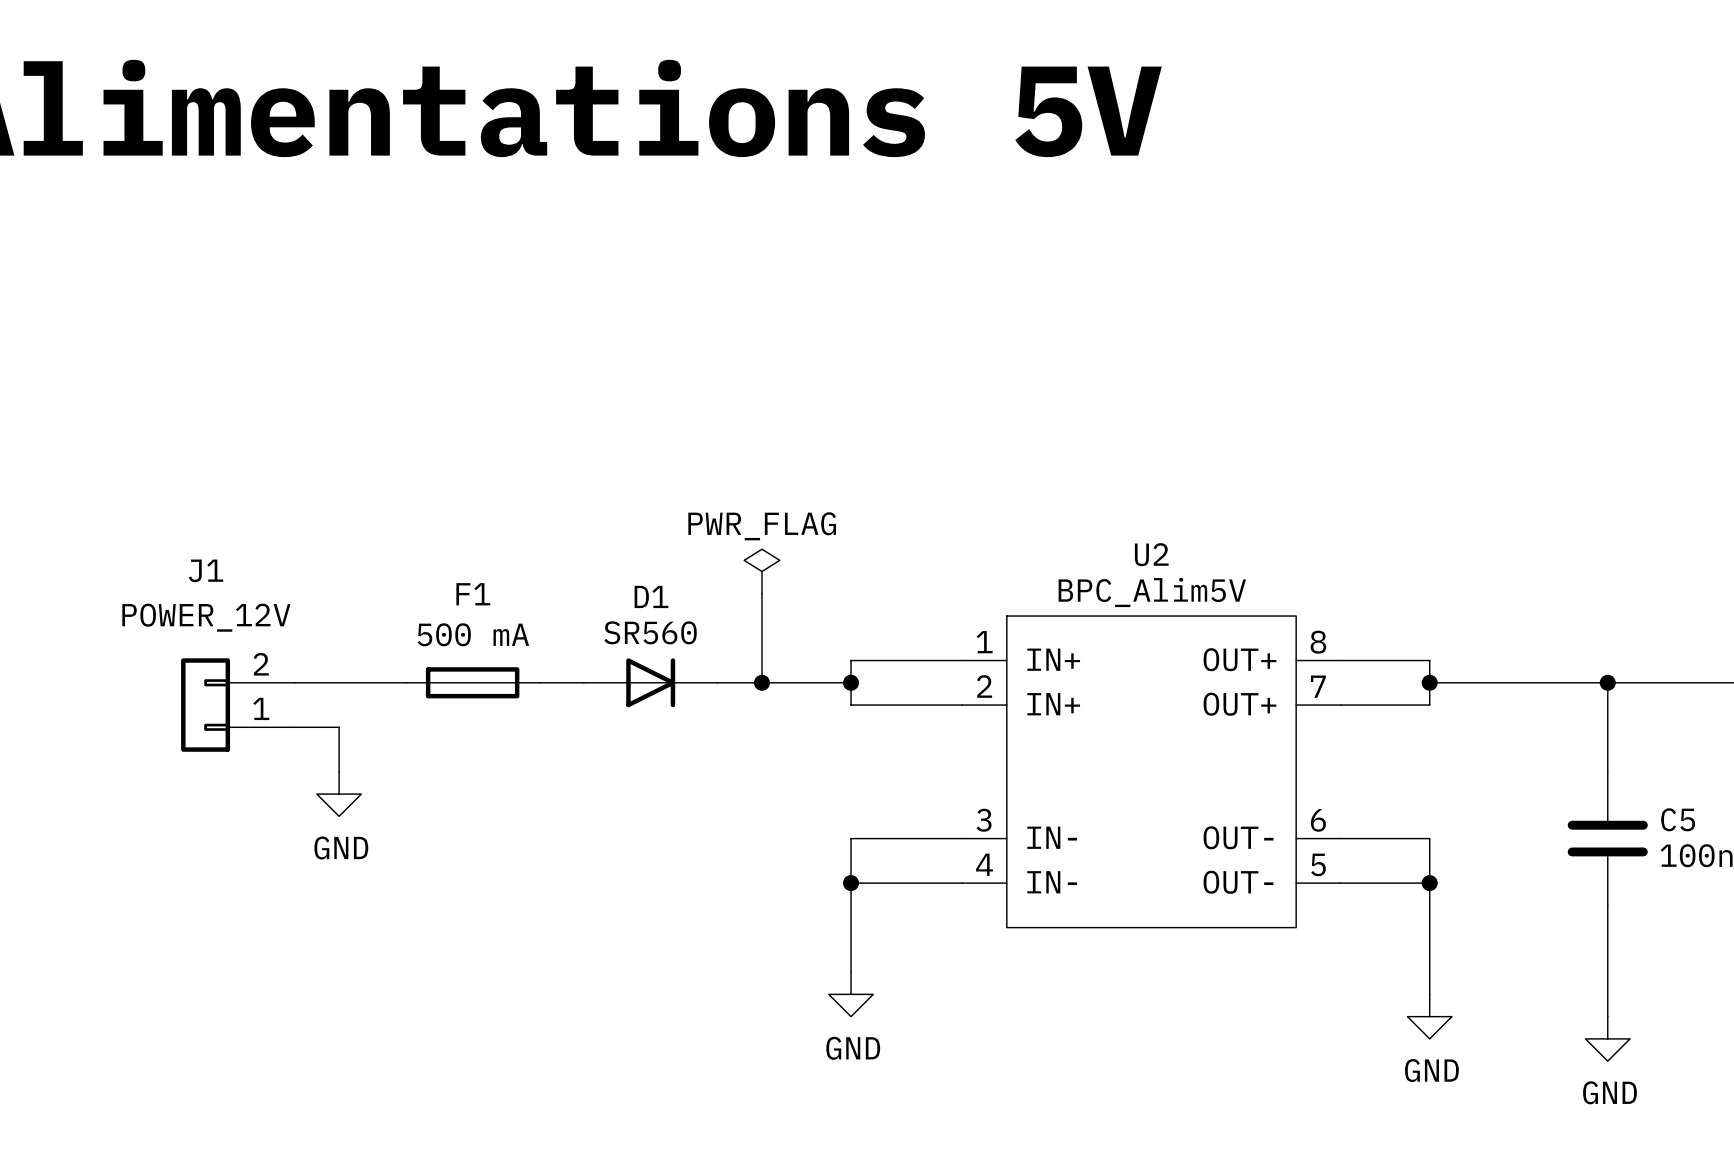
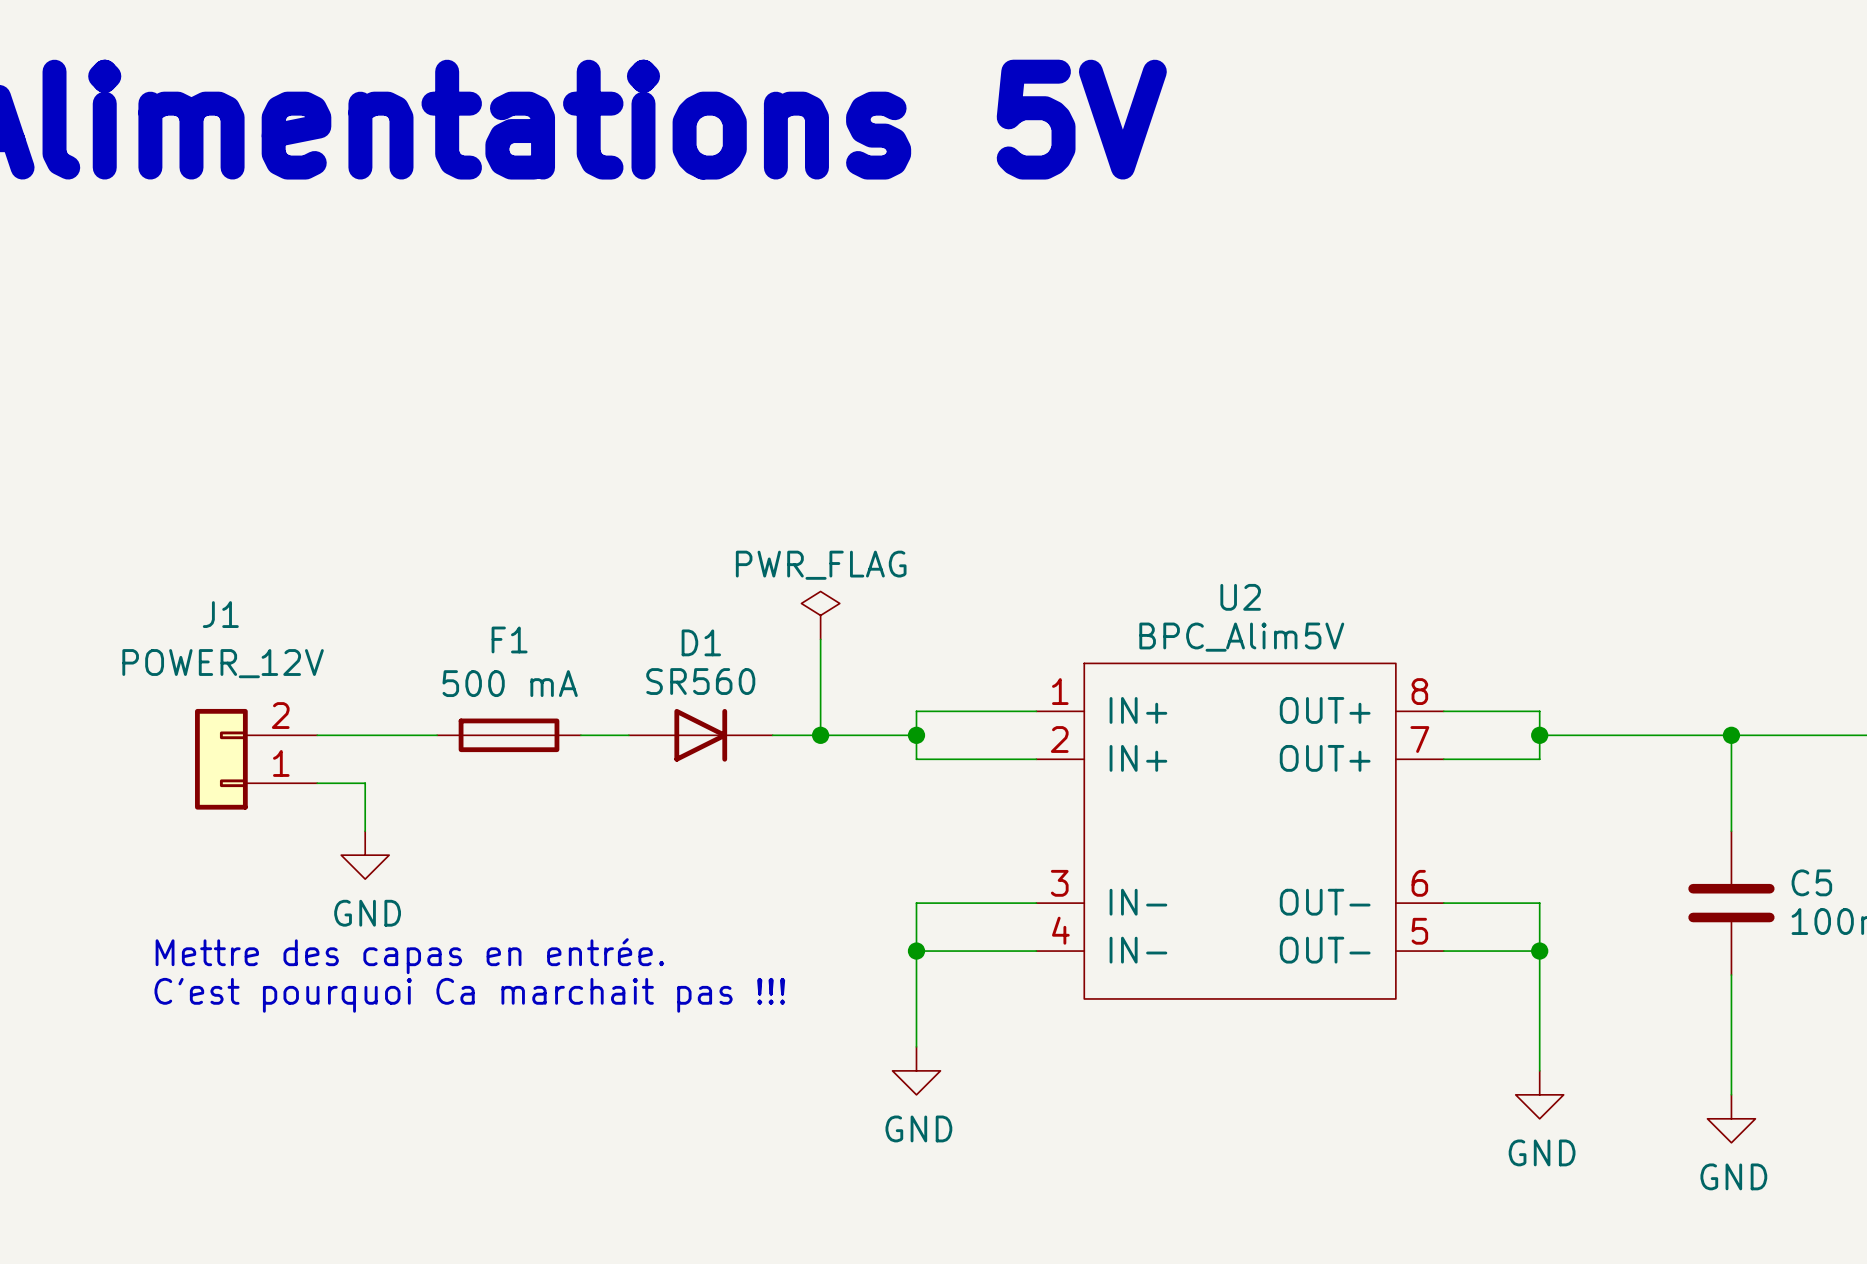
text: none -> Mettre des capas en entrée. (409, 956)
text: none -> C'est pourquoi Ca marchait pas !!! (469, 995)

